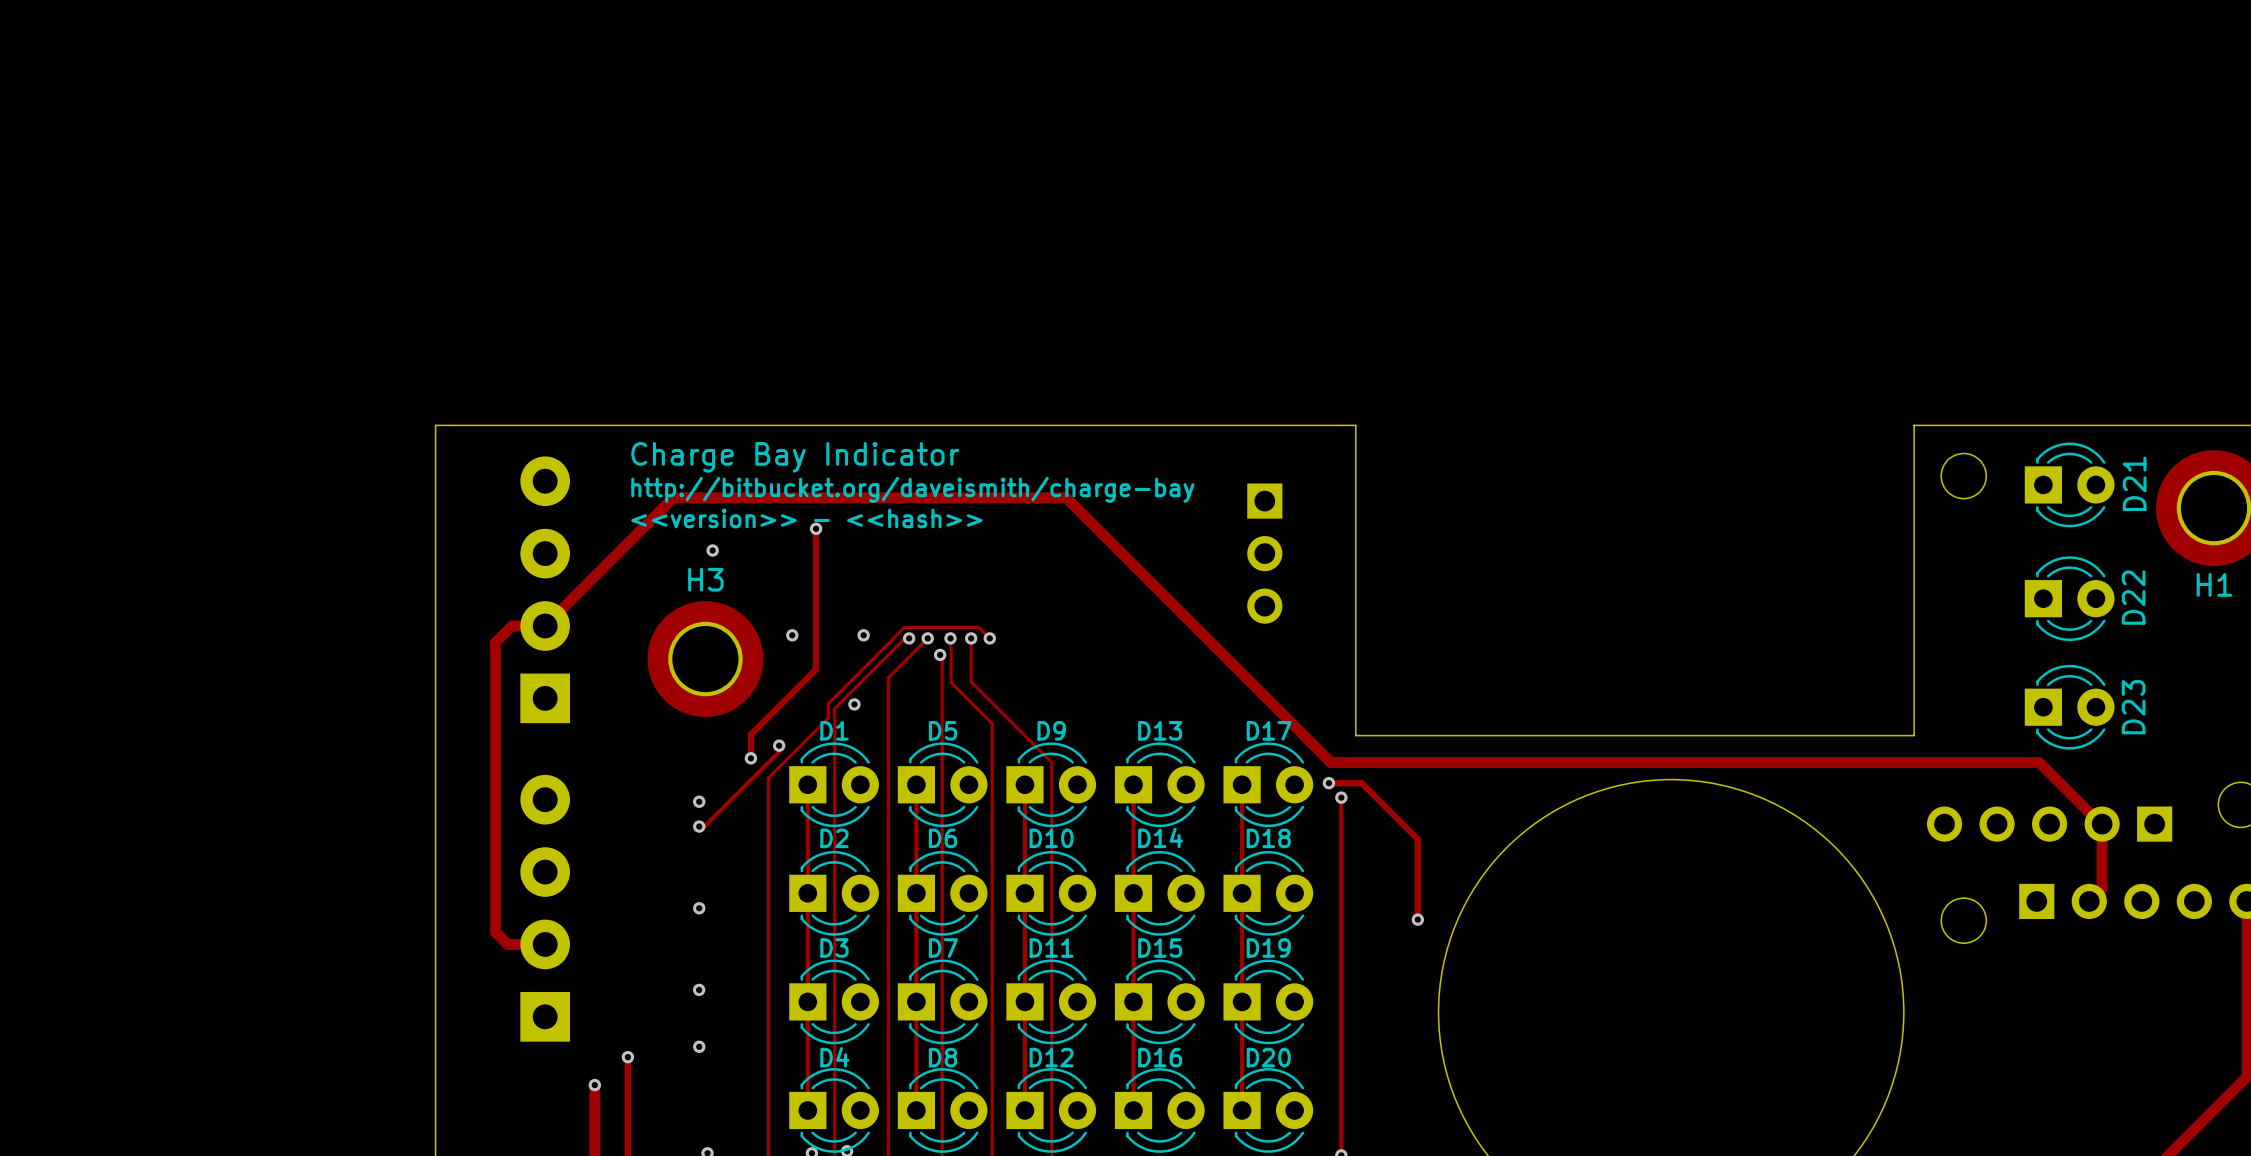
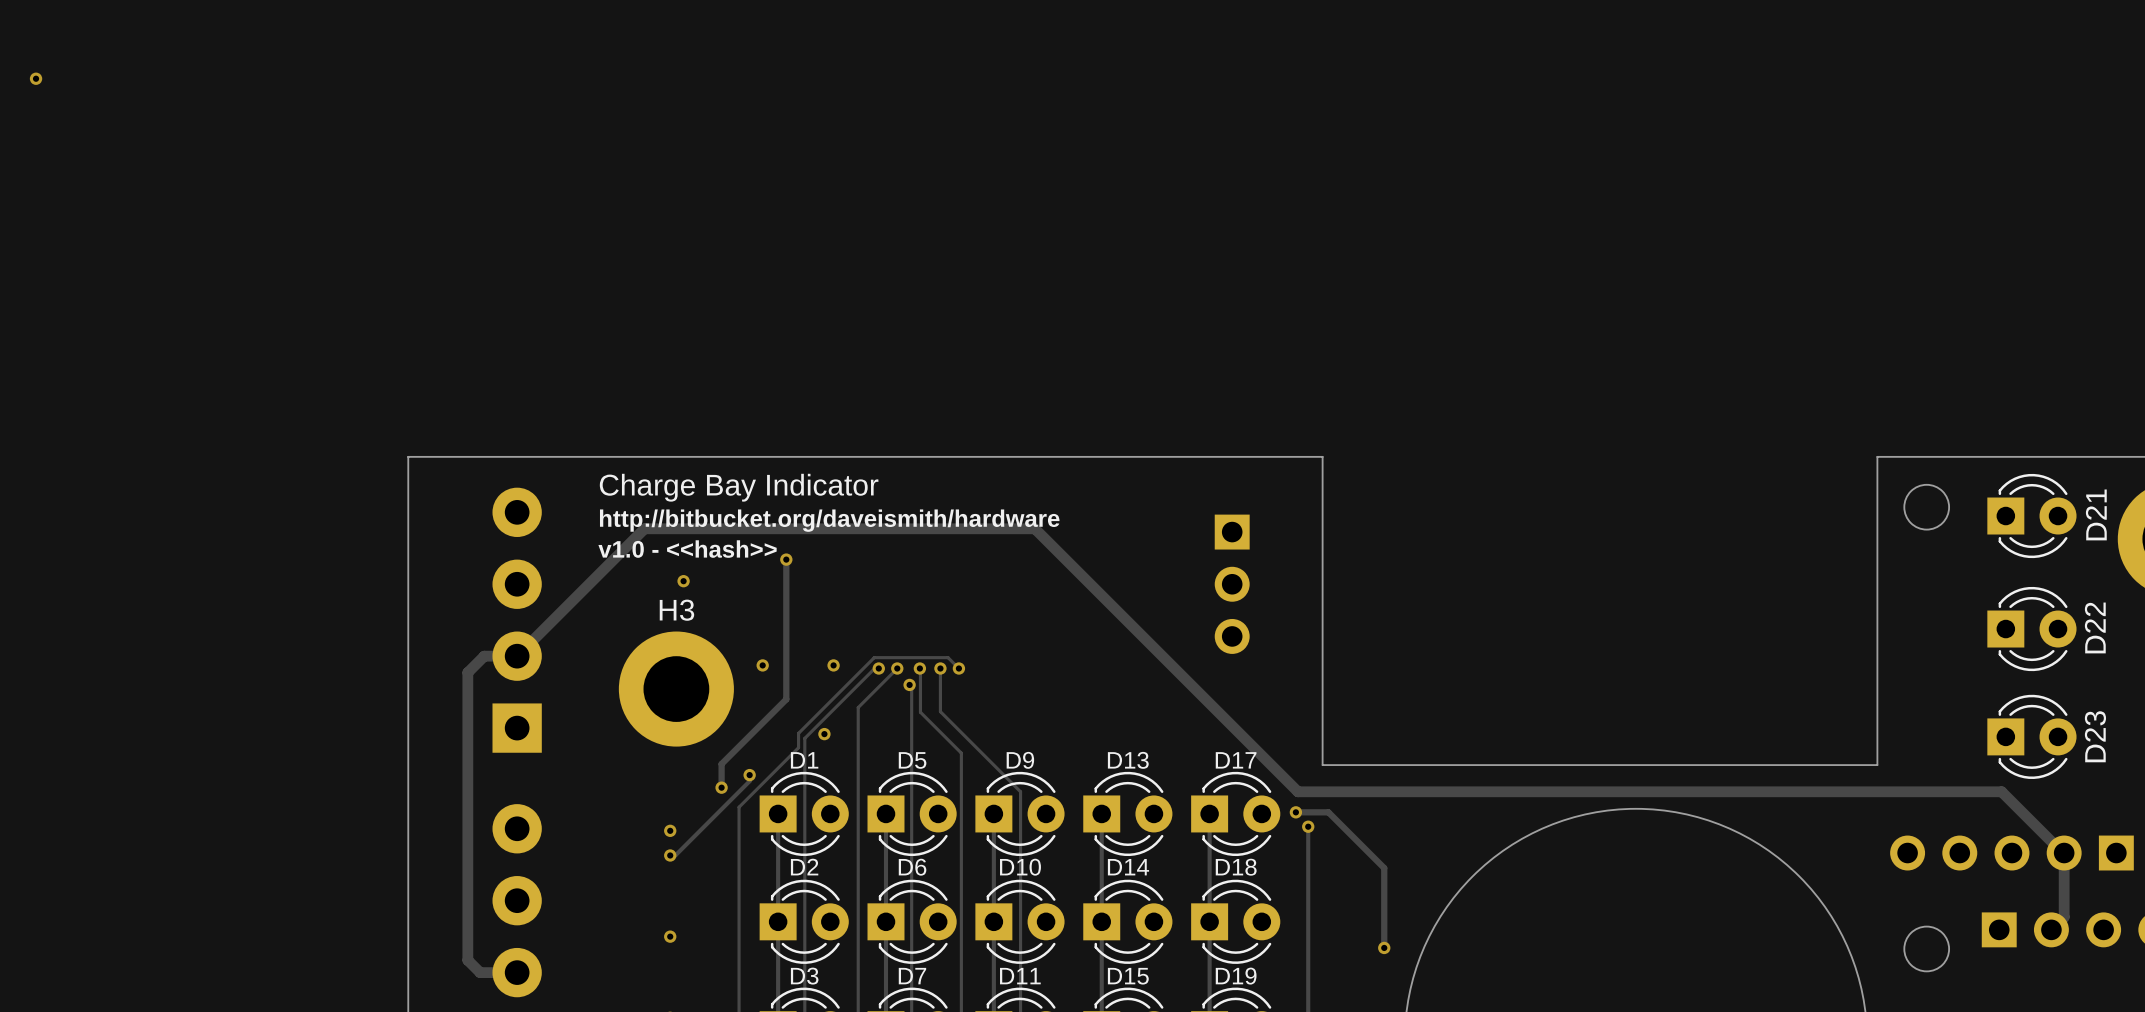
via: none -> (36, 78)
text: http://bitbucket.org/daveismith/charge-bay (912, 489) -> http://bitbucket.org/daveismith/hardware (829, 520)
text: <<version>> - <<hash>> (806, 518) -> v1.0 - <<hash>> (687, 549)

